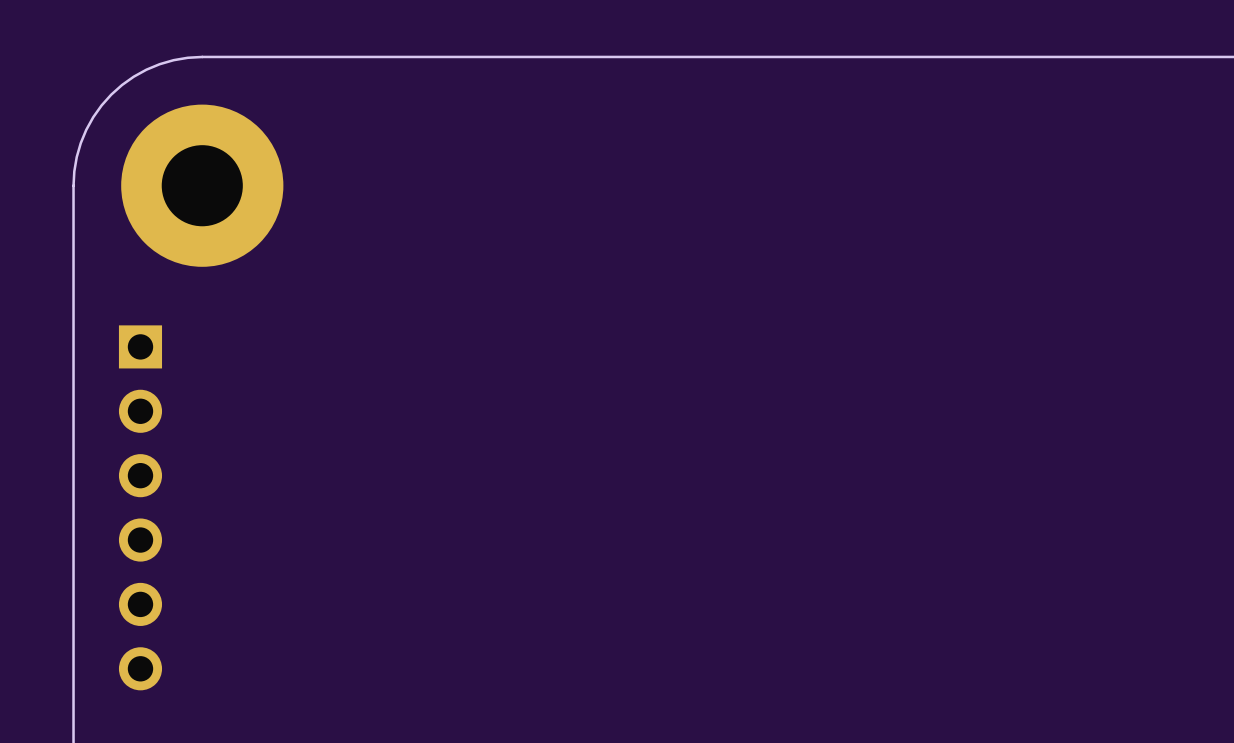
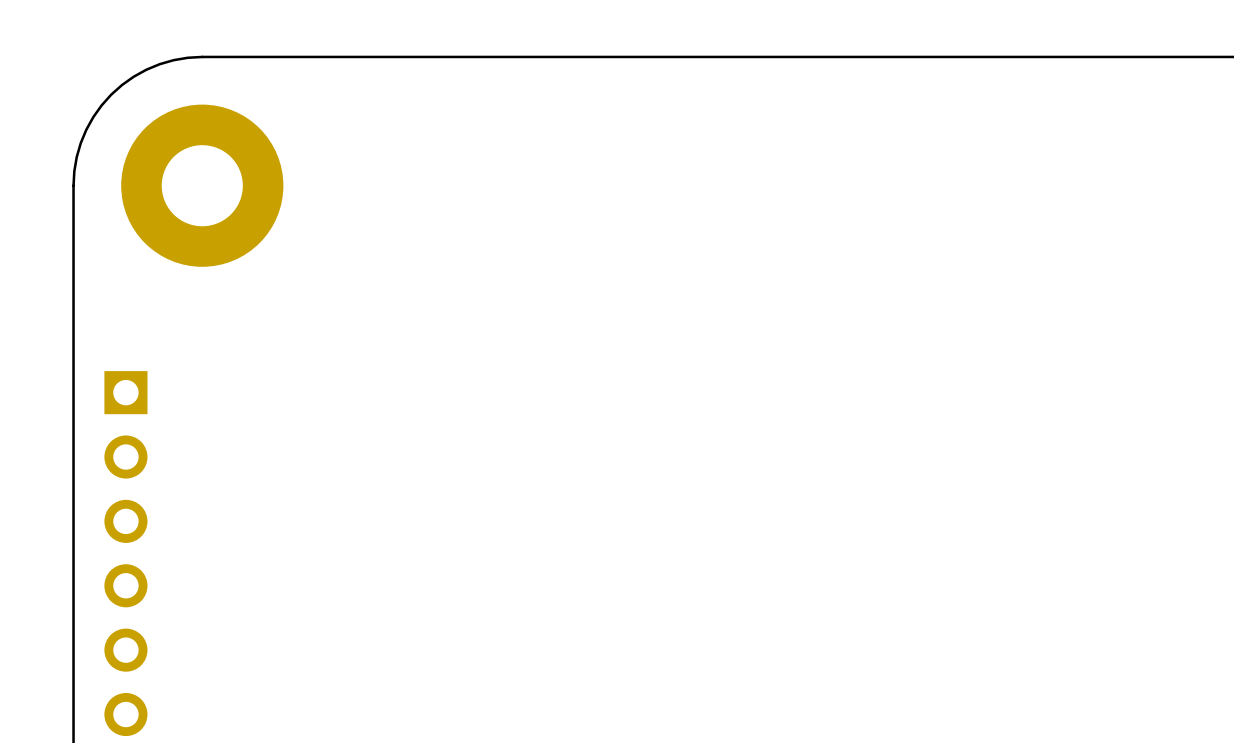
part position: (140, 507) -> (125, 553)

